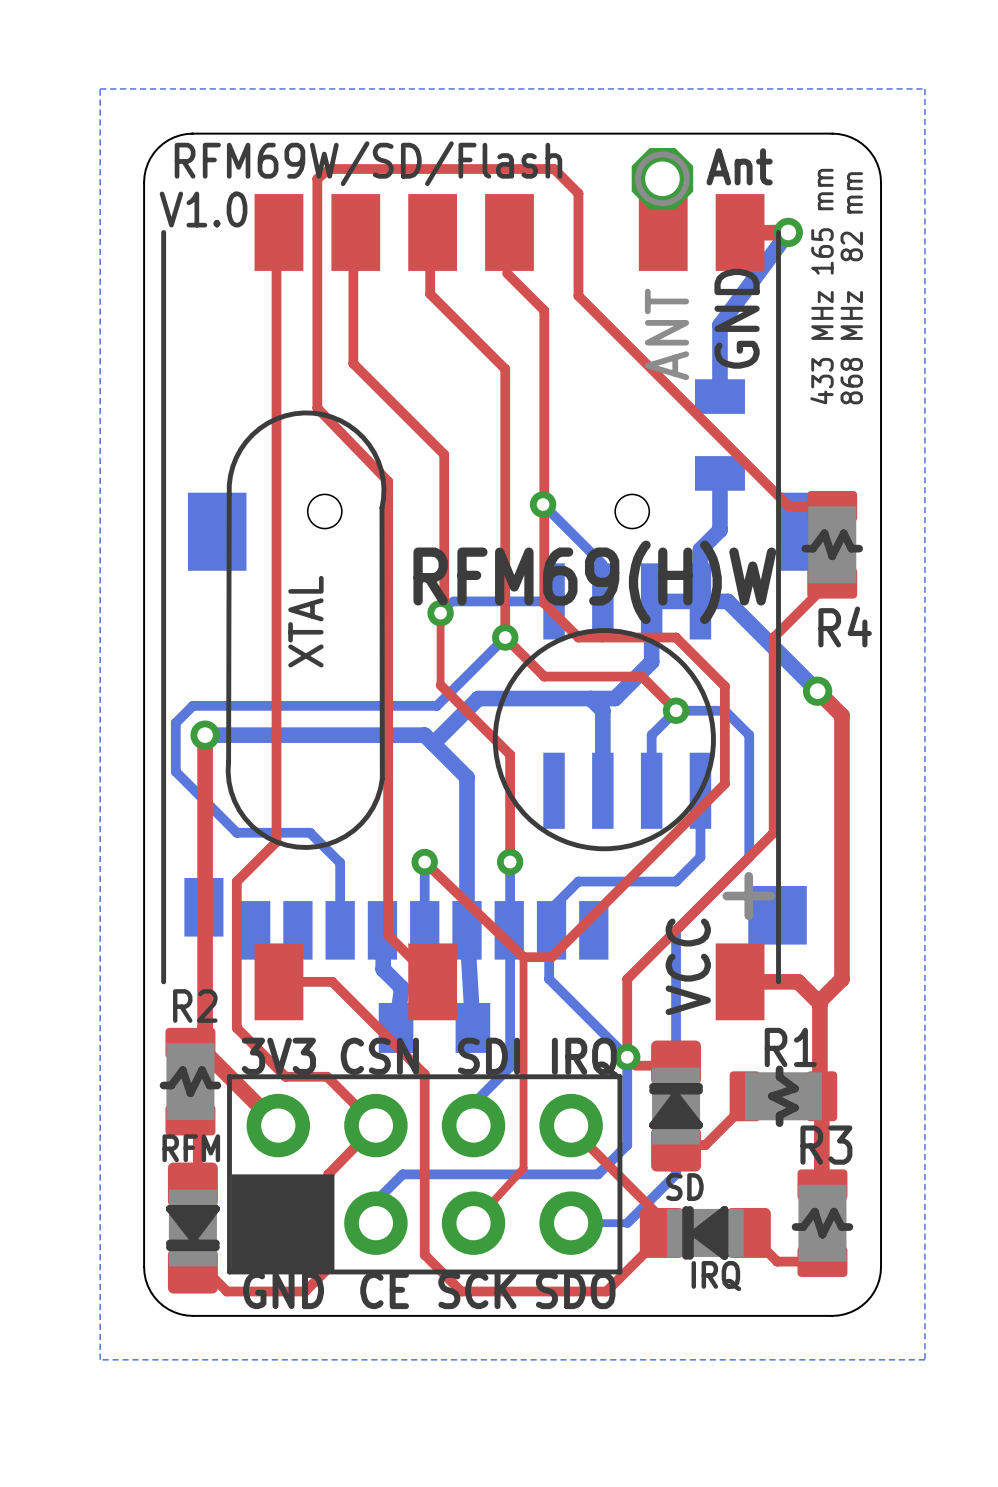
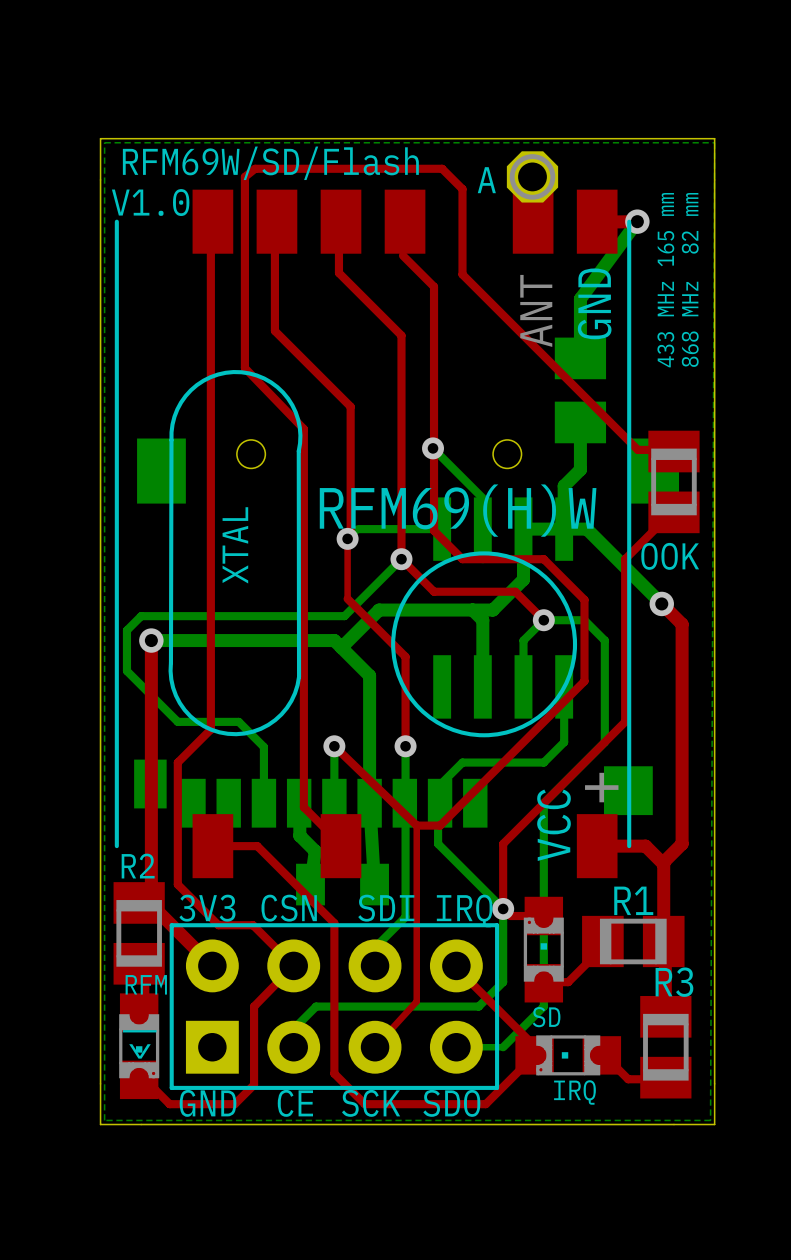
bottom zone outline: (100, 88) (100, 1359) (924, 1359) (924, 88) (100, 88) -> (104, 142) (104, 1120) (710, 1120) (714, 142) (104, 142)
board edge: (191, 133) (838, 134) (856, 140) (870, 152) (879, 169) (881, 182) -> (100, 179) (100, 138) (714, 138) (714, 179)
board edge: (192, 133) (174, 137) (158, 147) (147, 163) (144, 182) -> none
text: Ant (739, 166) -> none
text: none -> A (486, 180)
part footprint: [695, 379, 745, 491] -> [554, 337, 607, 444]
part footprint: [801, 491, 863, 599] -> [648, 430, 700, 534]
text: R4 (845, 626) -> OOK (670, 556)
part footprint: [159, 1027, 222, 1136] -> [113, 882, 165, 985]
part footprint: [649, 1040, 703, 1172] -> [523, 896, 564, 1003]
part footprint: [729, 1065, 838, 1128] -> [582, 915, 685, 968]
part footprint: [165, 1162, 220, 1294] -> [119, 993, 160, 1100]
part footprint: [791, 1169, 854, 1277] -> [640, 996, 692, 1099]
drawing: [231, 1174, 335, 1272] -> none
part footprint: [639, 1206, 771, 1260] -> [515, 1035, 622, 1076]
text: none -> <| (139, 1044)
board edge: (144, 1267) (147, 1285) (158, 1301) (174, 1312) (192, 1315) -> (100, 1083) (100, 1124) (141, 1124)
board edge: (881, 1267) (877, 1285) (866, 1301) (850, 1312) (832, 1315) -> (714, 1083) (714, 1124) (673, 1124)

